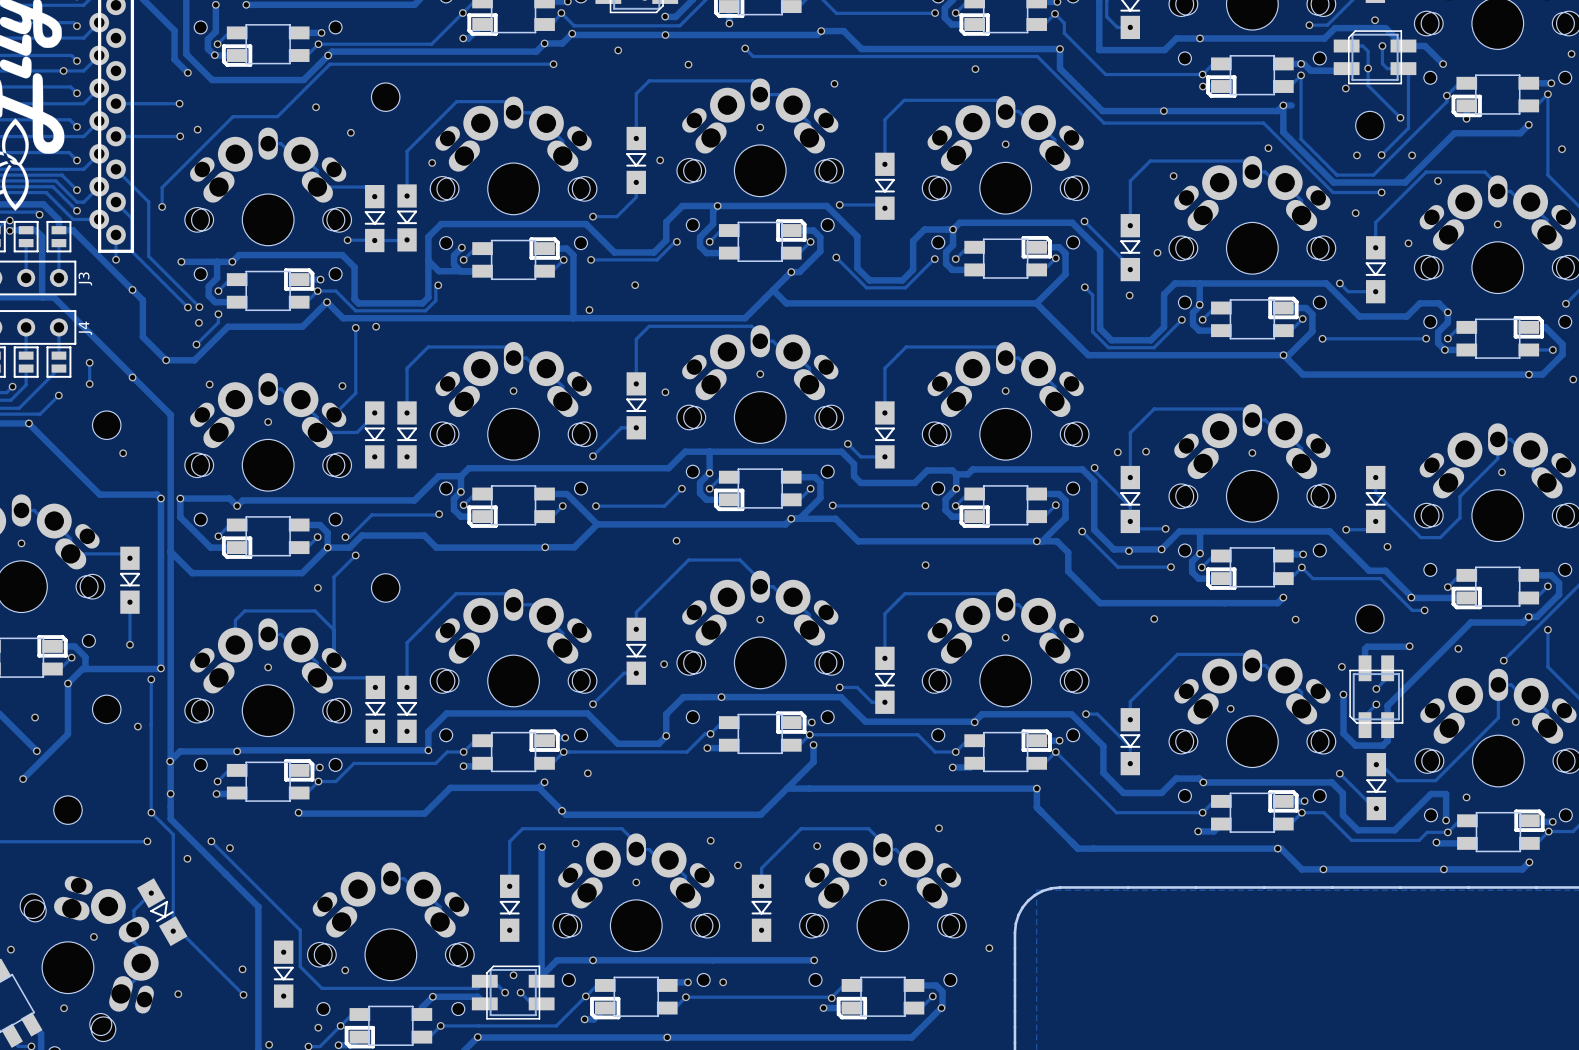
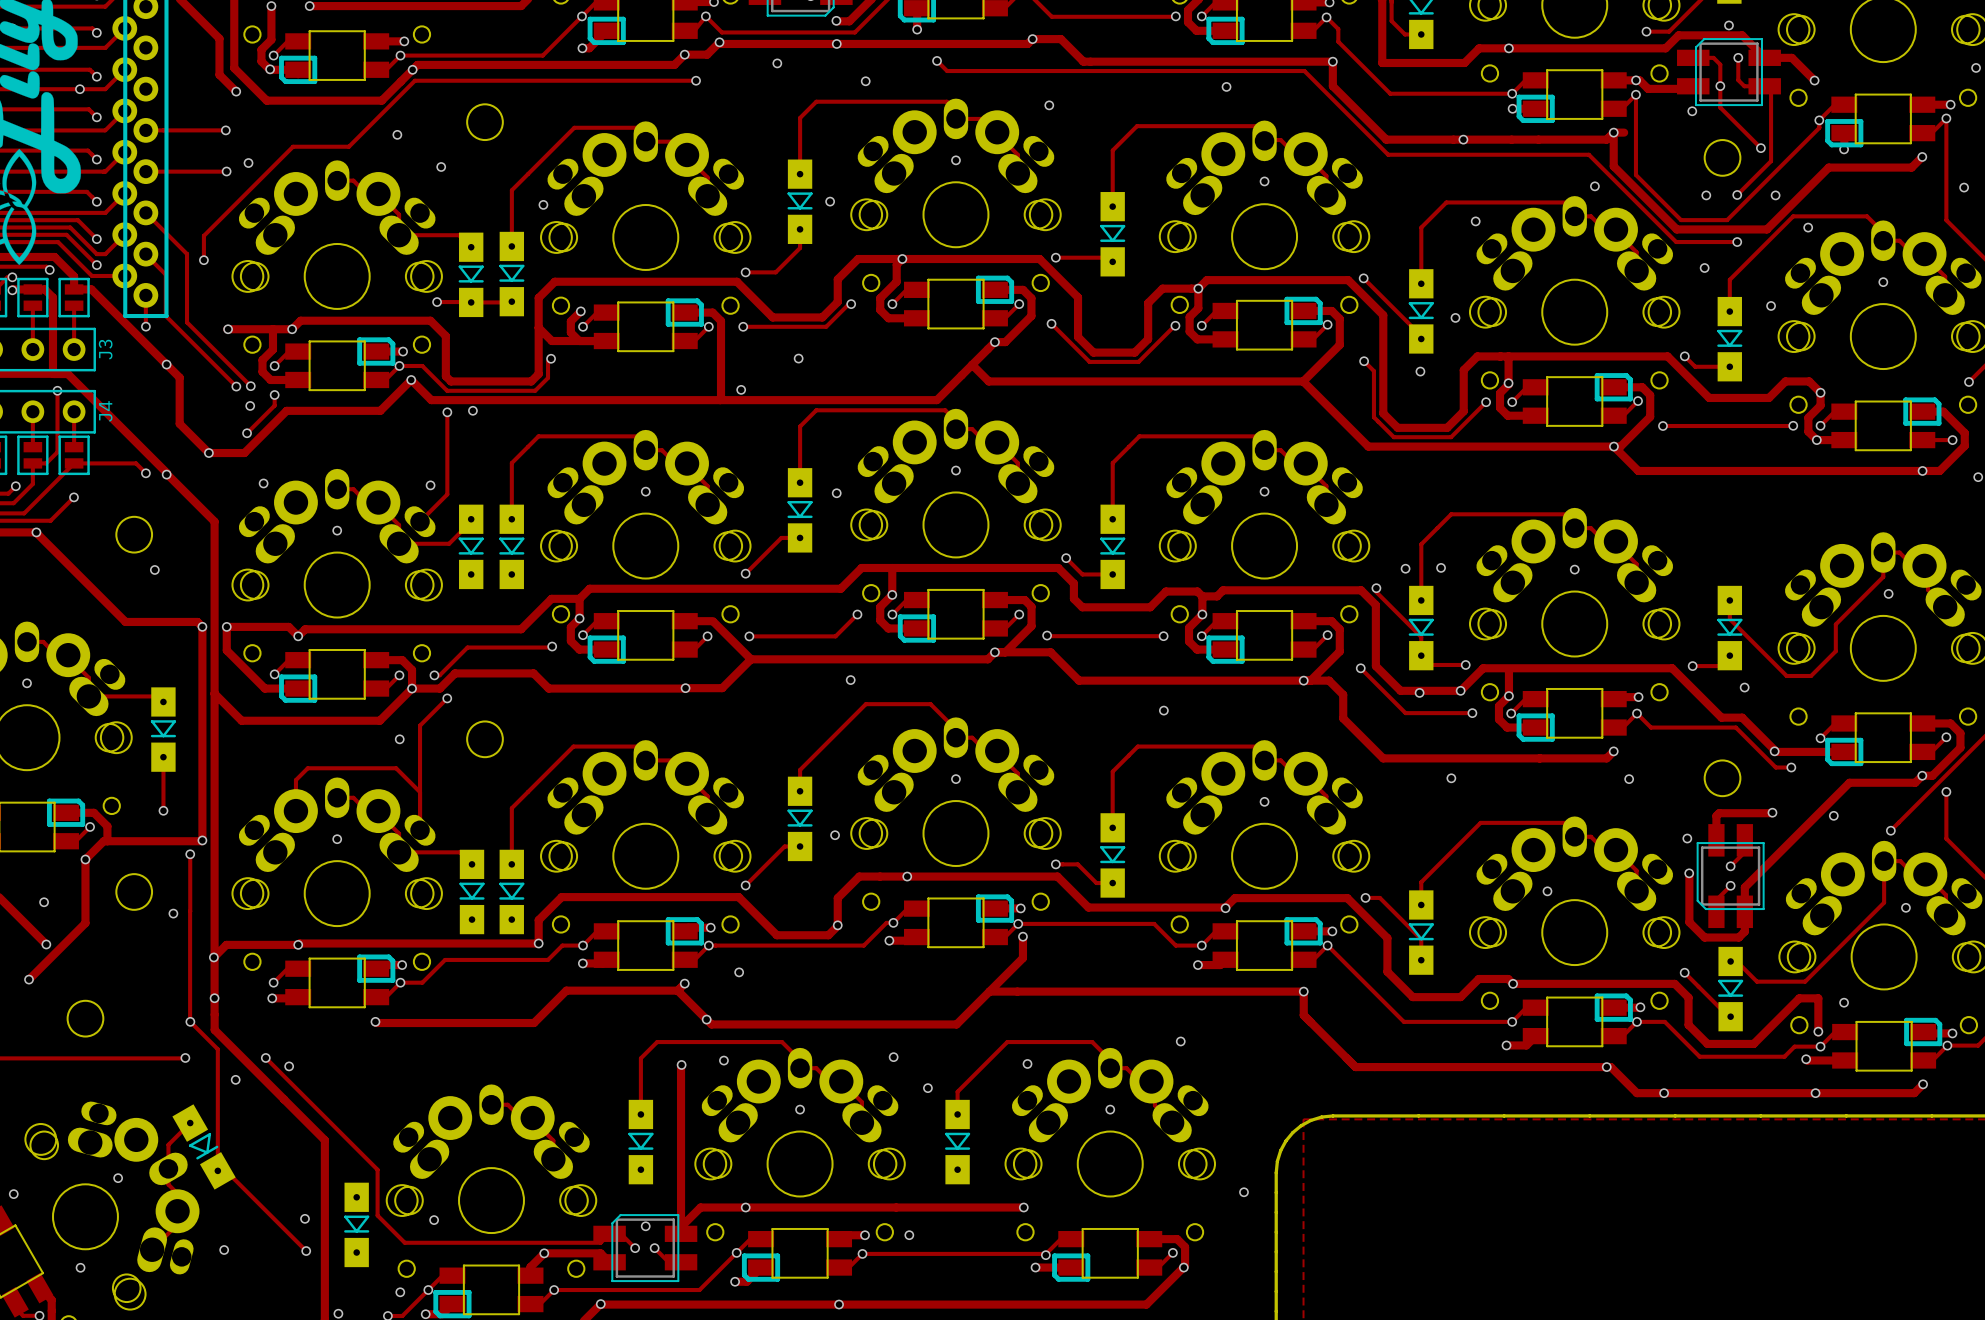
track: none -> (57, 390) (57, 452) (46, 463) (32, 463)
via: none -> (57, 390)
track: (89, 362) (89, 384) -> none
via: (89, 362) -> none
track: none -> (74, 463) (136, 463) (145, 473)
via: none -> (145, 473)
via: (89, 384) -> none

